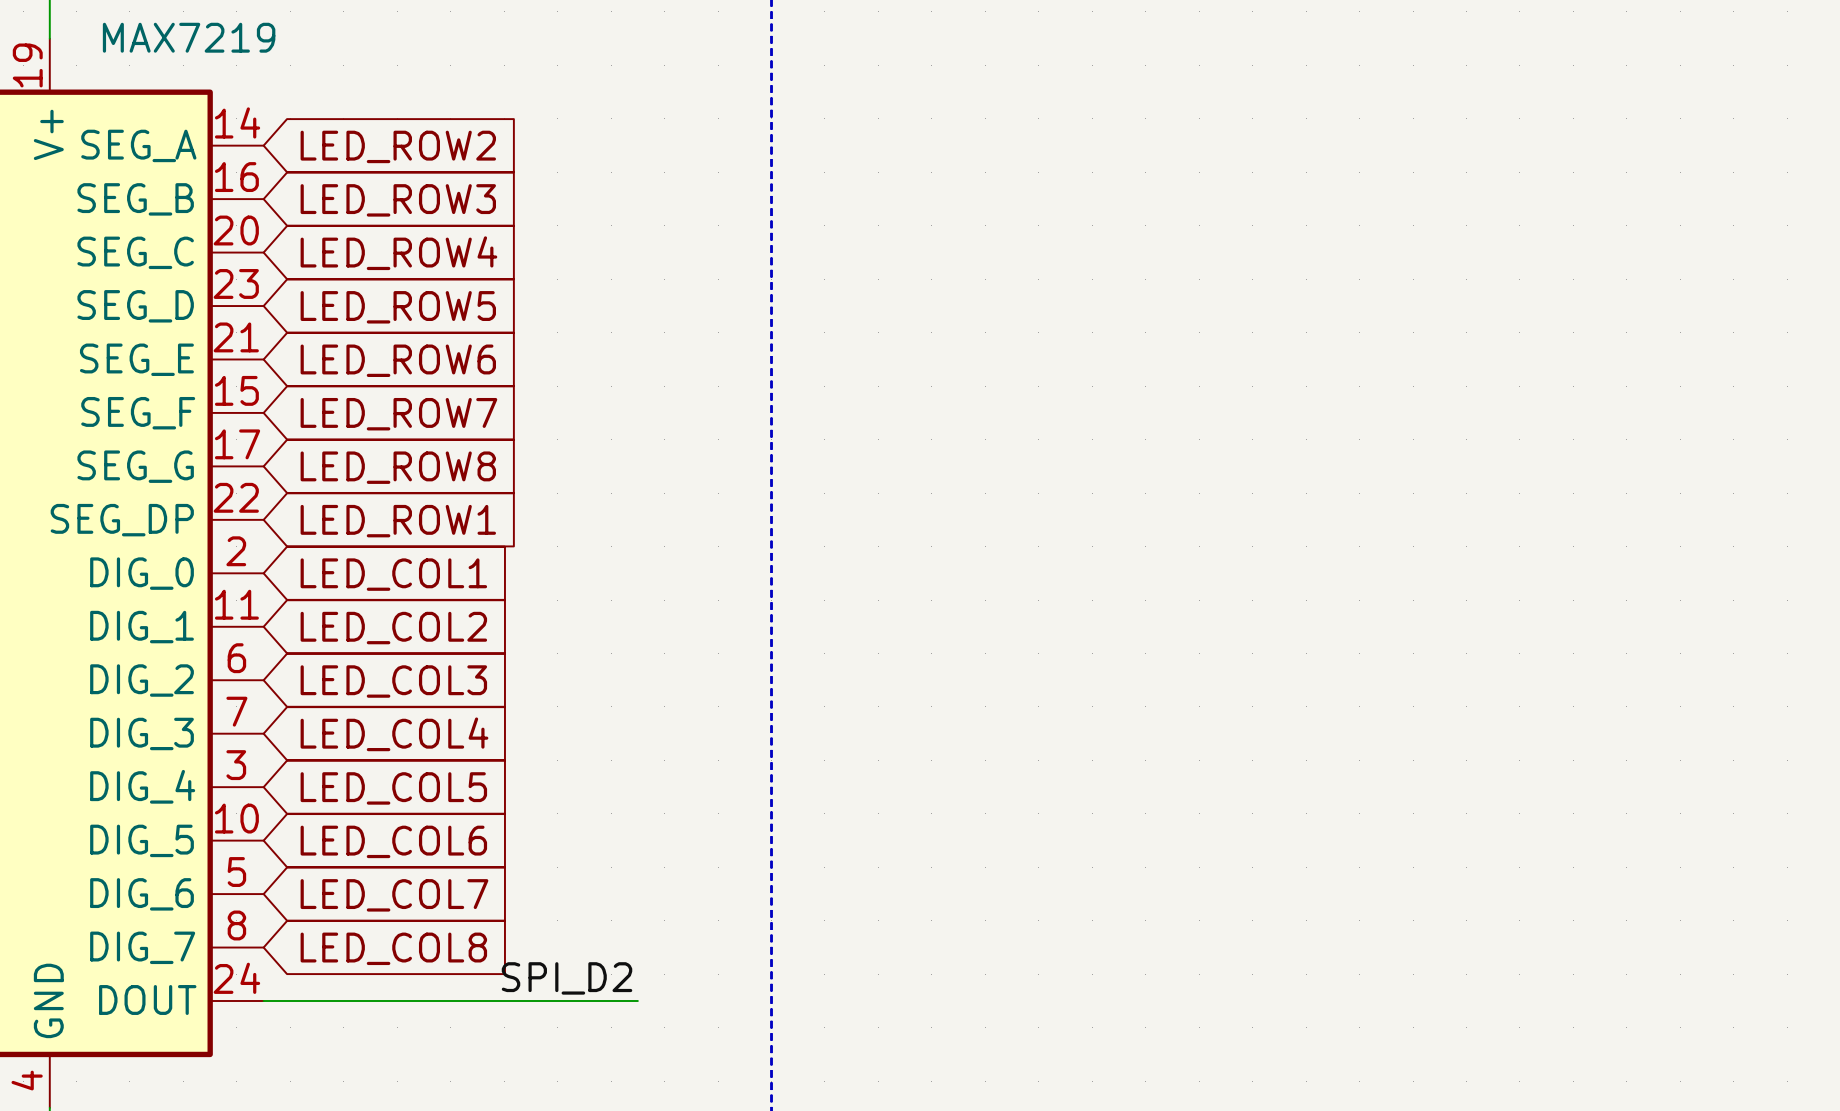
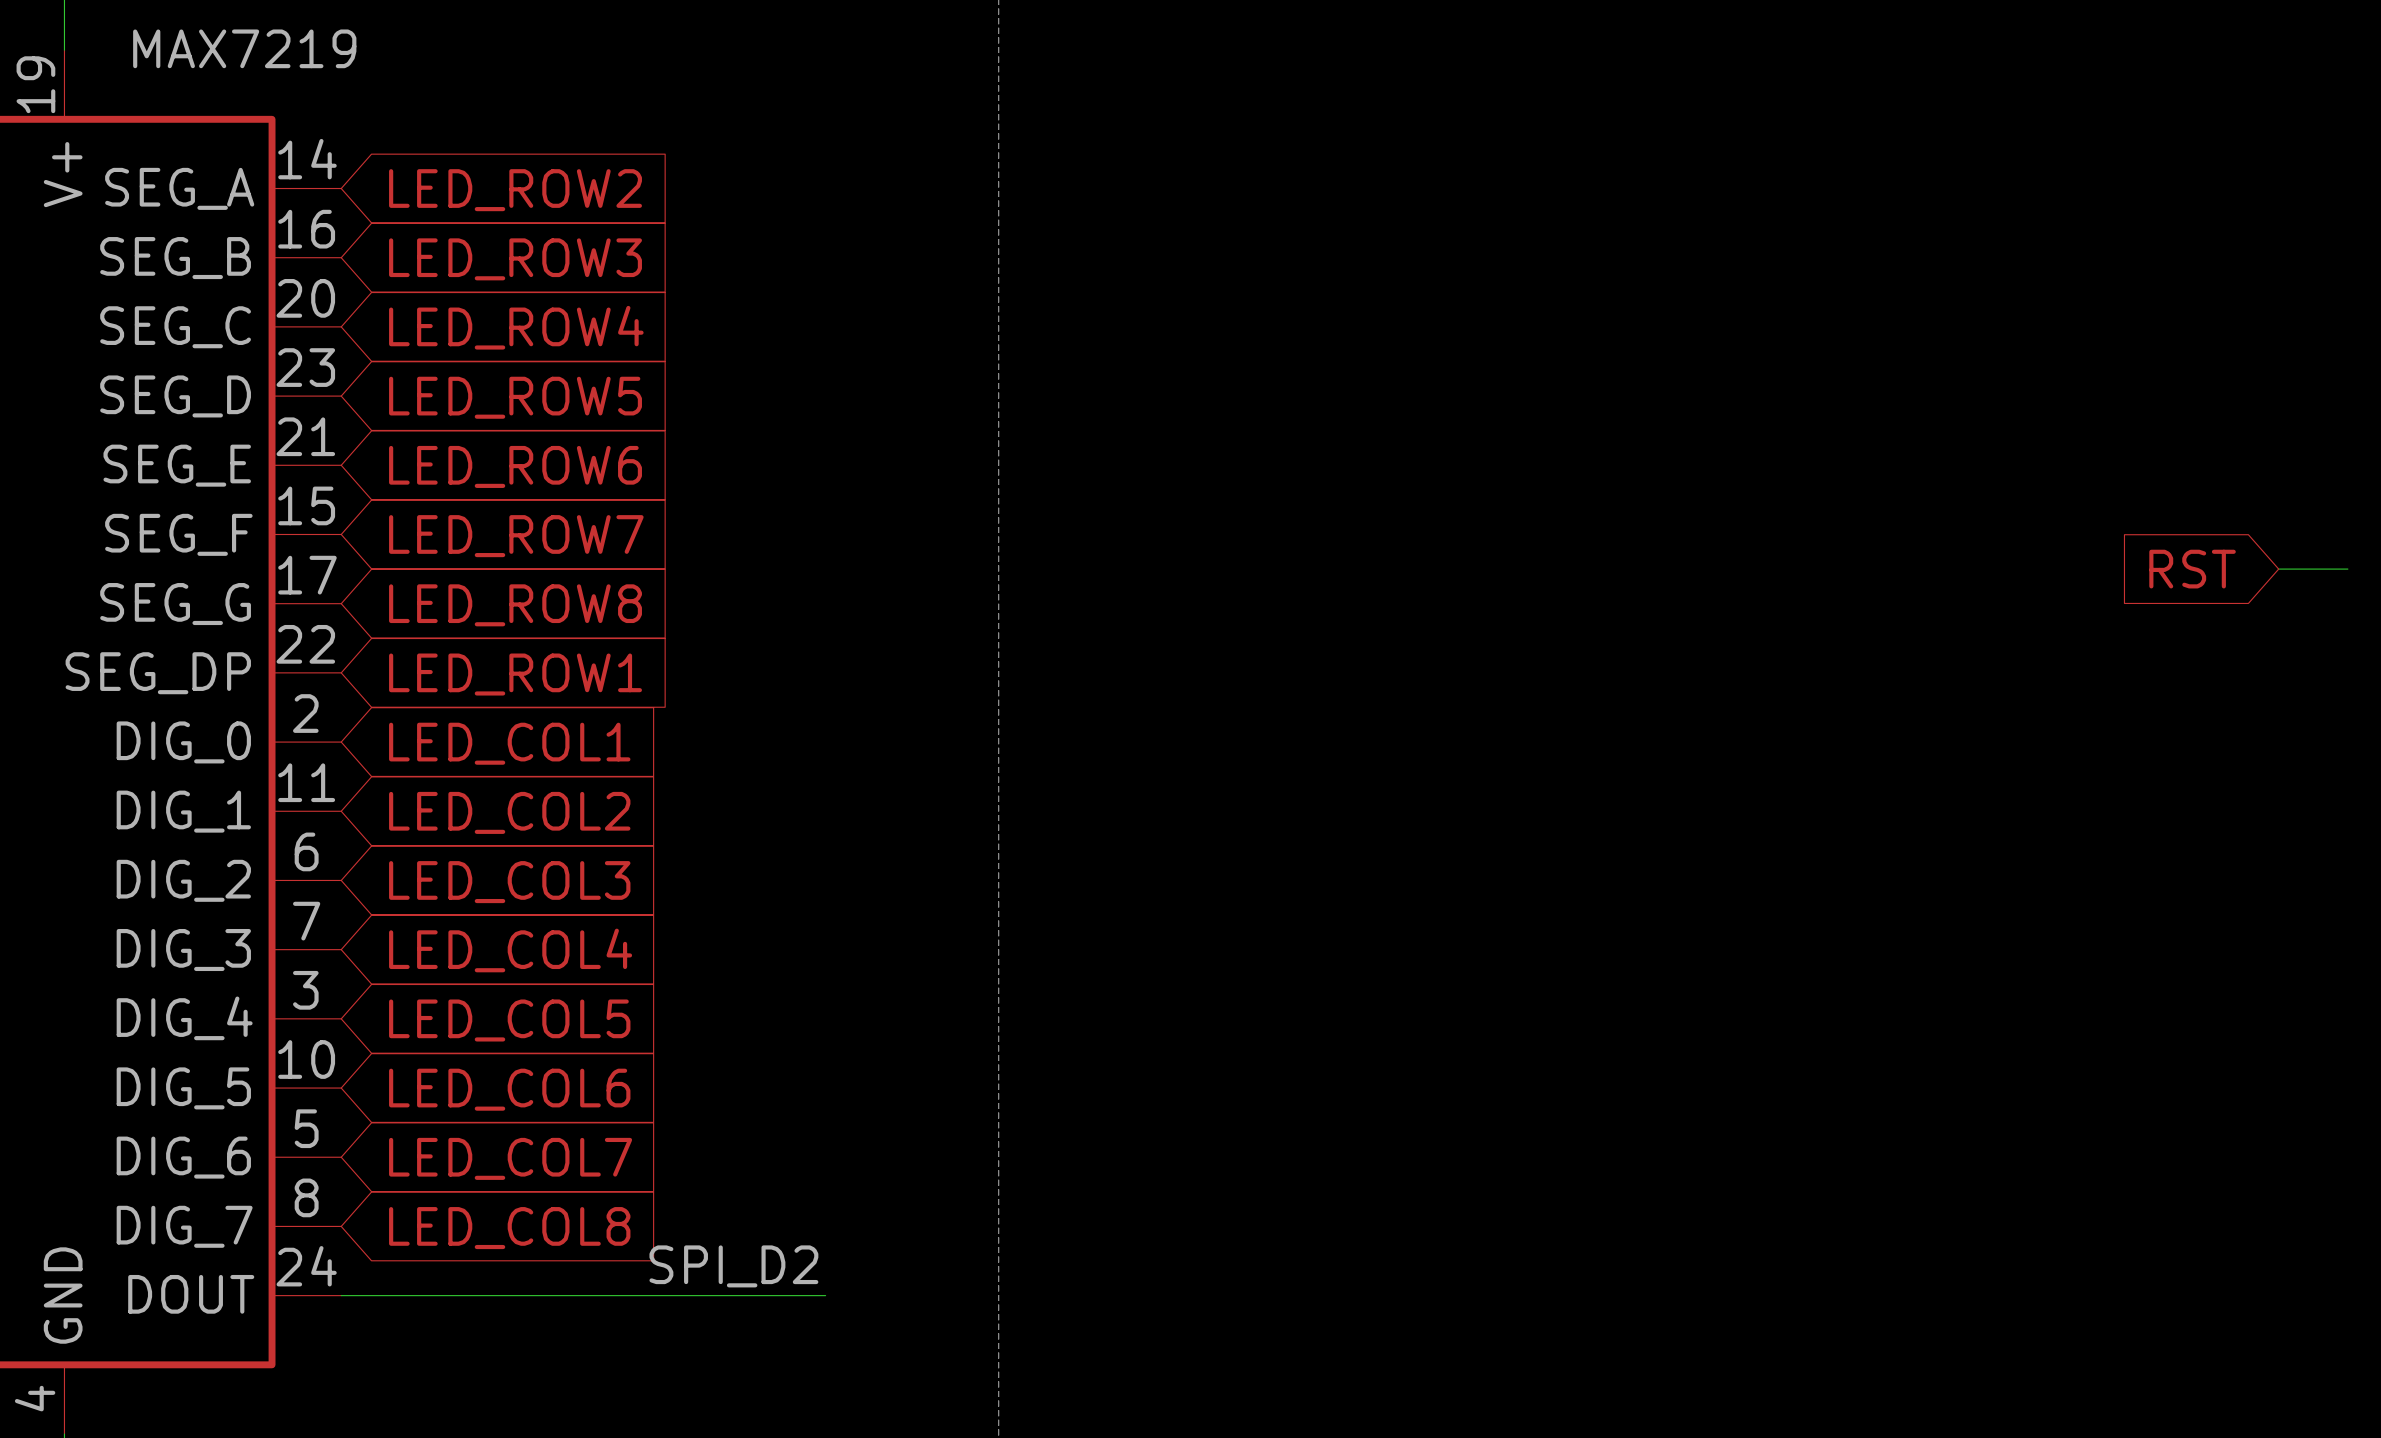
global label: none -> RST (2192, 569)
wire: none -> (2278, 569) (2347, 569)

